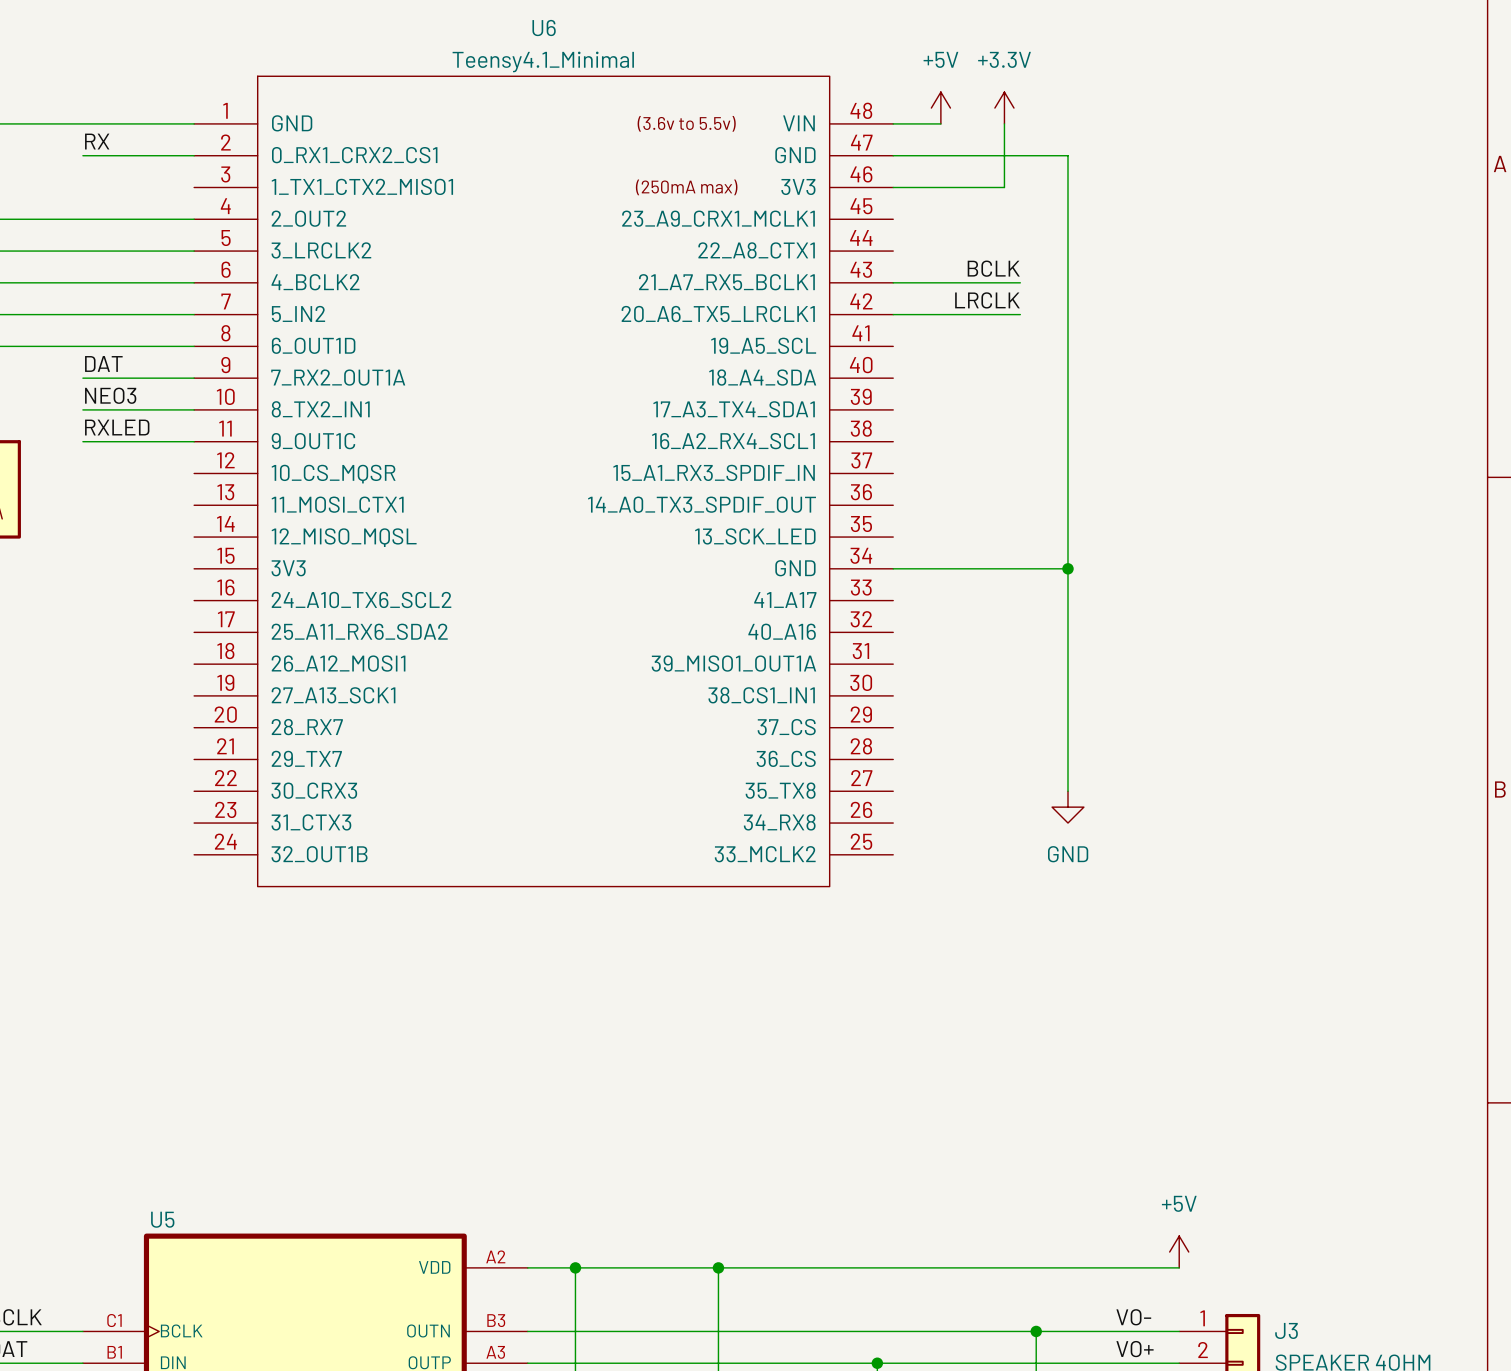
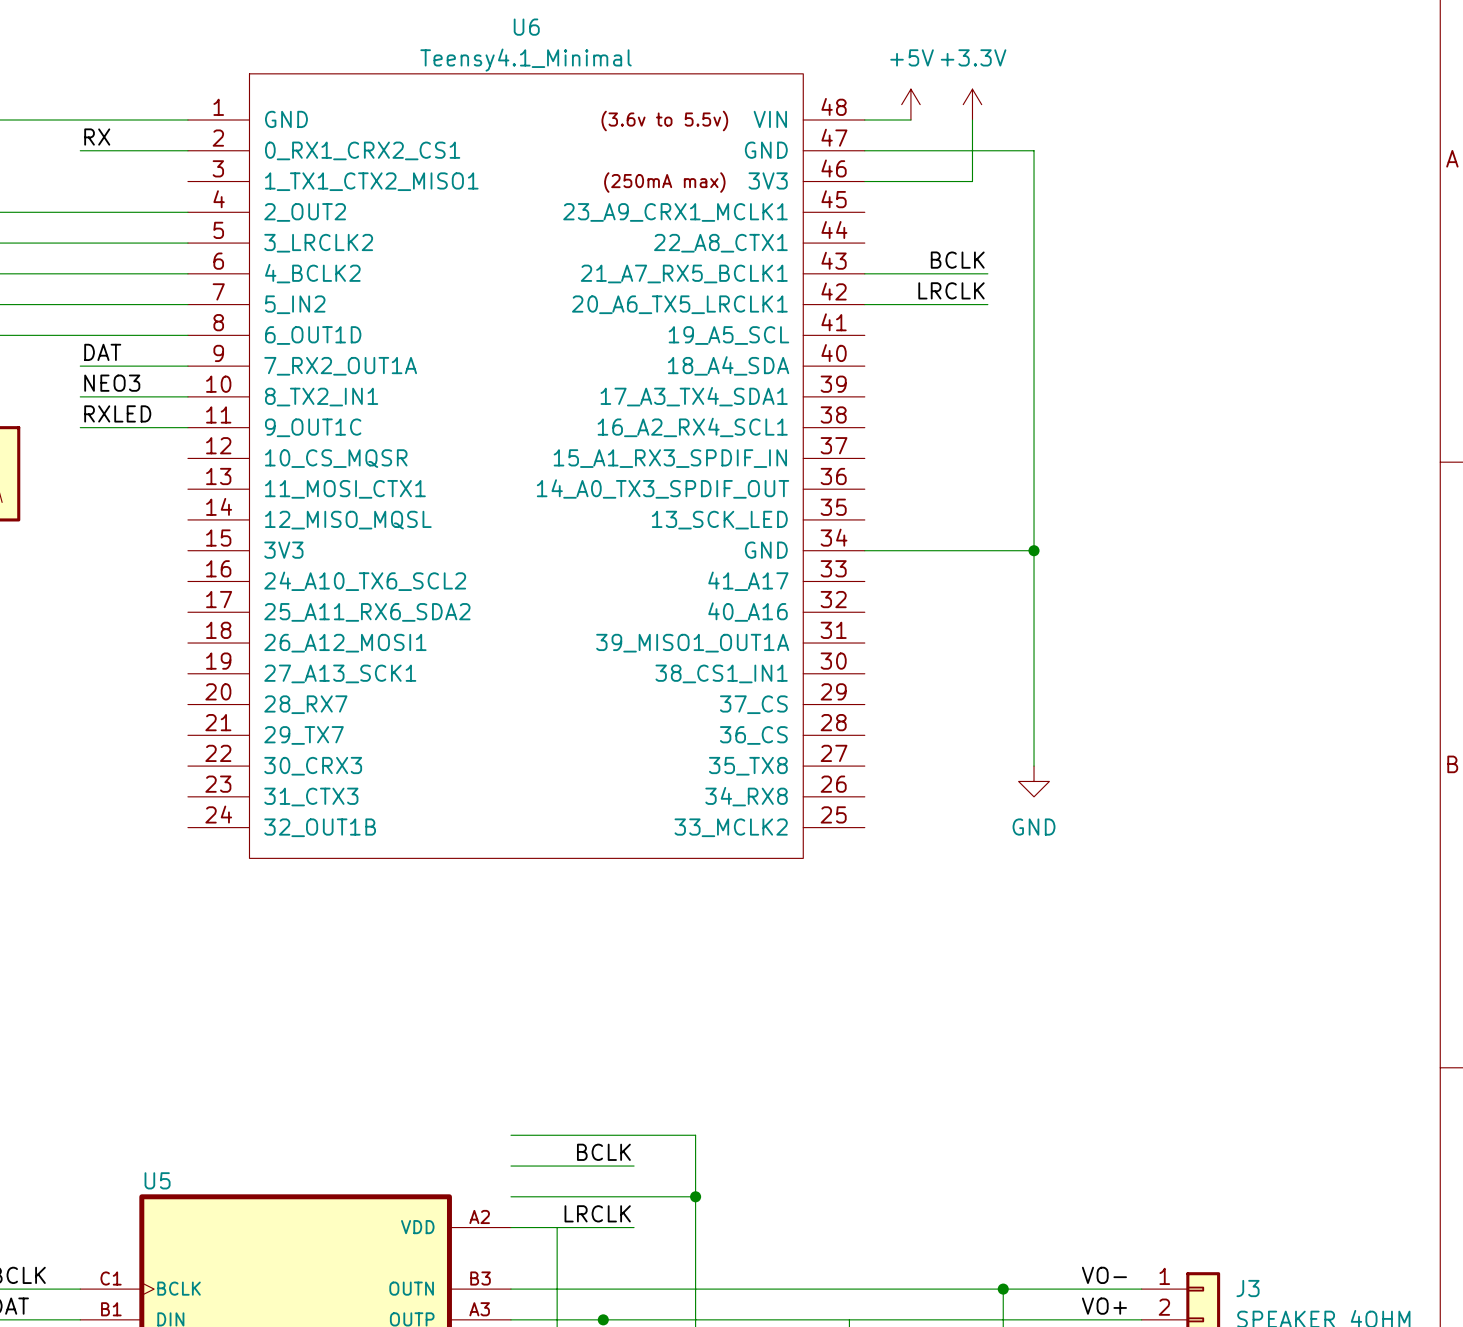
wire: none -> (510, 1135) (695, 1135) (695, 1227)
label: none -> BCLK (603, 1152)
wire: none -> (510, 1166) (634, 1166)
wire: none -> (510, 1196) (695, 1196)
power symbol: +5V (1179, 1252) -> none
label: none -> LRCLK (597, 1213)
junction: (575, 1267) -> none
wire: (654, 1267) (1179, 1267) -> none
junction position: (718, 1267) -> (695, 1196)
junction: none -> (603, 1319)
junction: (877, 1363) -> none

